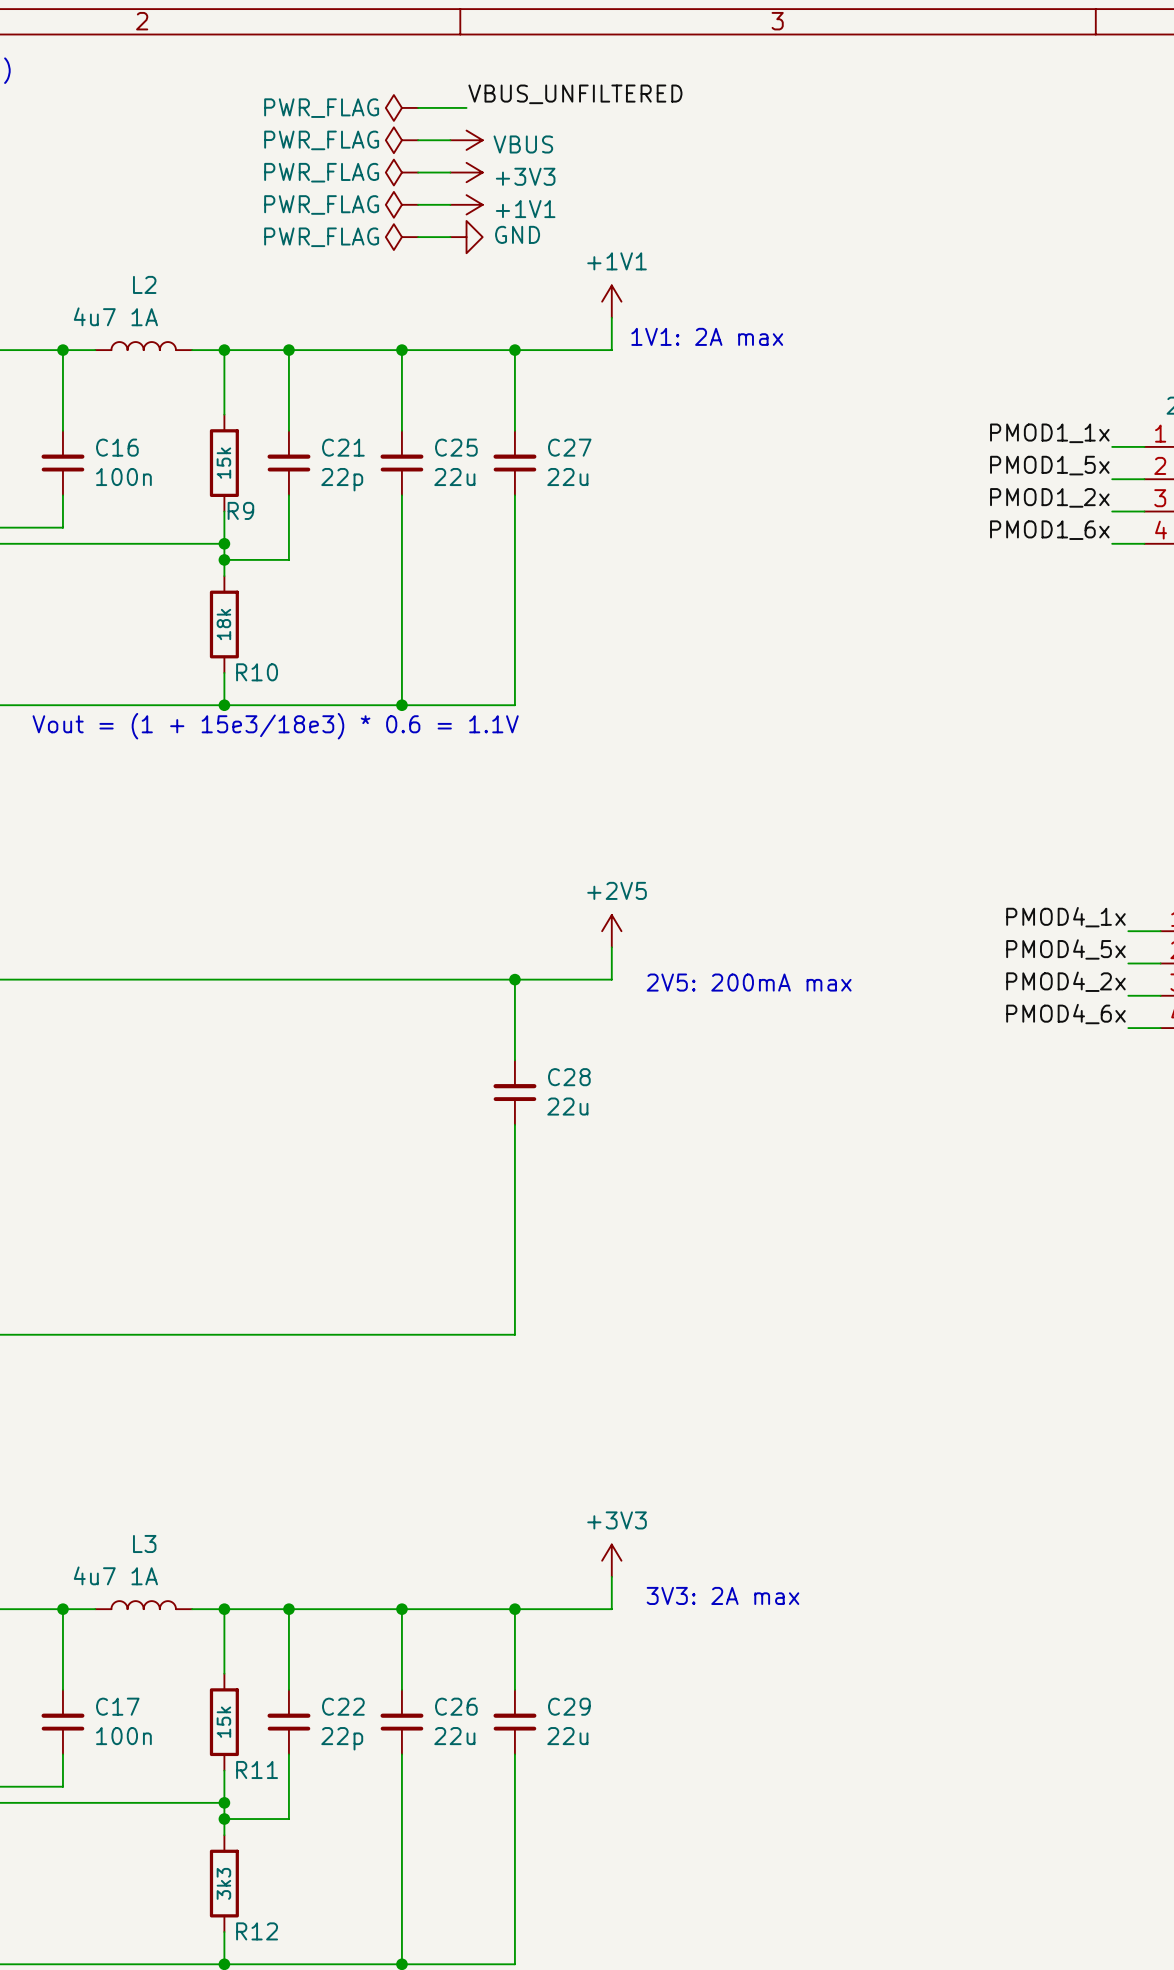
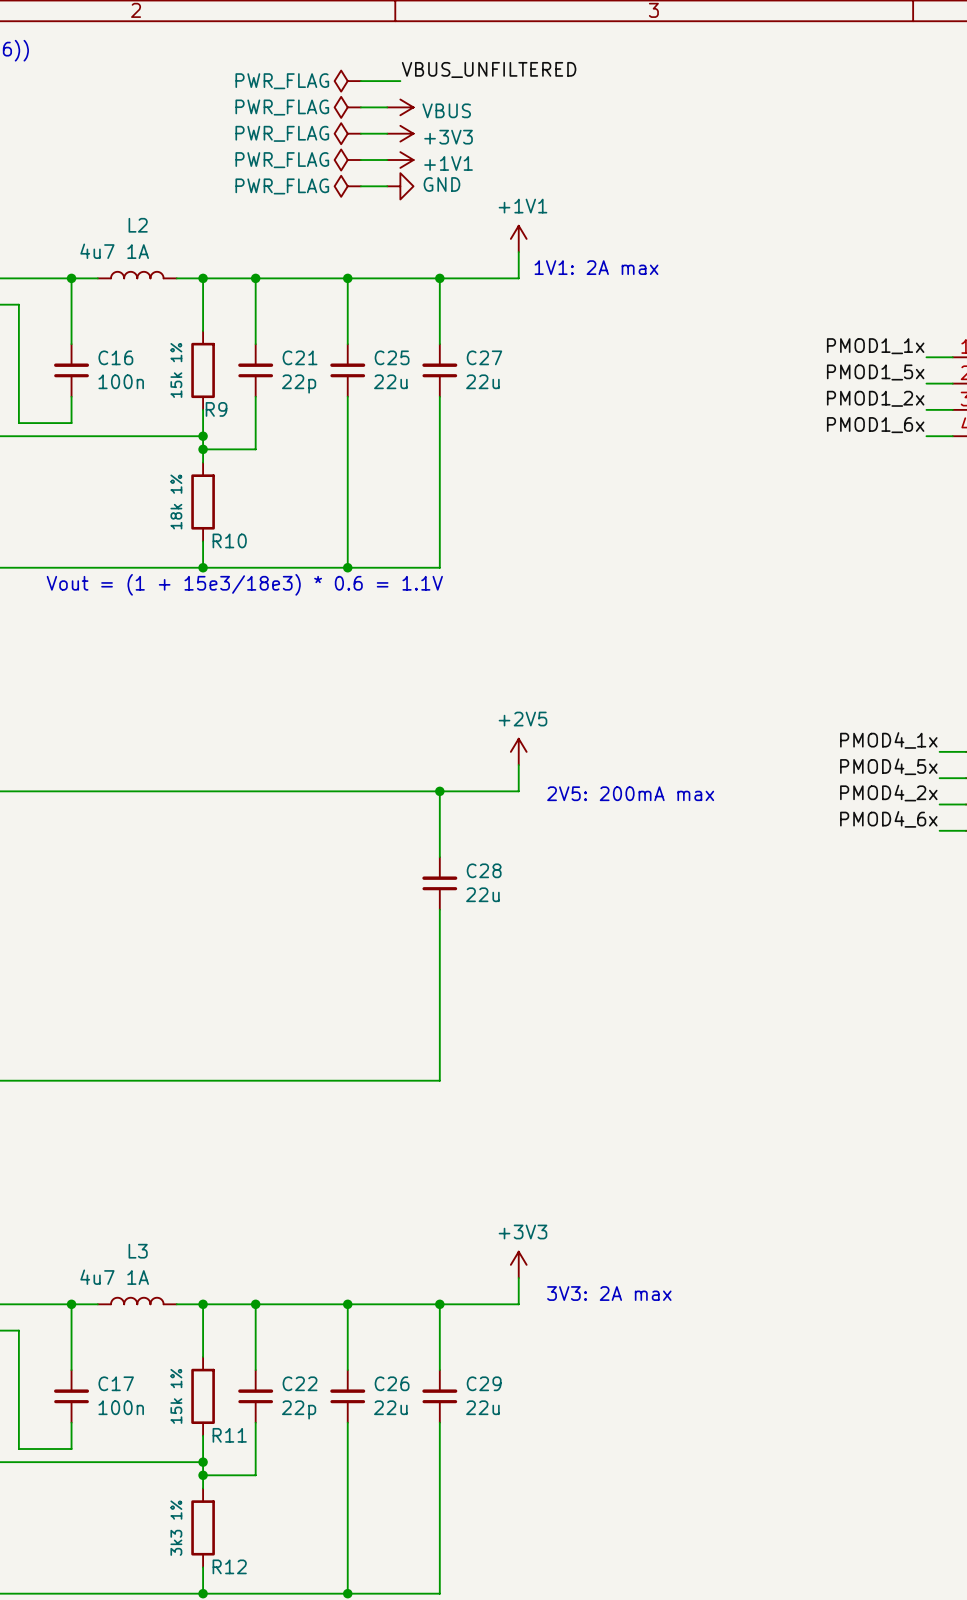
R9 value: 15k (223, 463) -> 15k 1% (176, 370)
R10 value: 18k (223, 624) -> 18k 1% (176, 501)
R11 value: 15k (223, 1722) -> 15k 1% (176, 1396)
R12 value: 3k3 (223, 1883) -> 3k3 1% (176, 1528)

